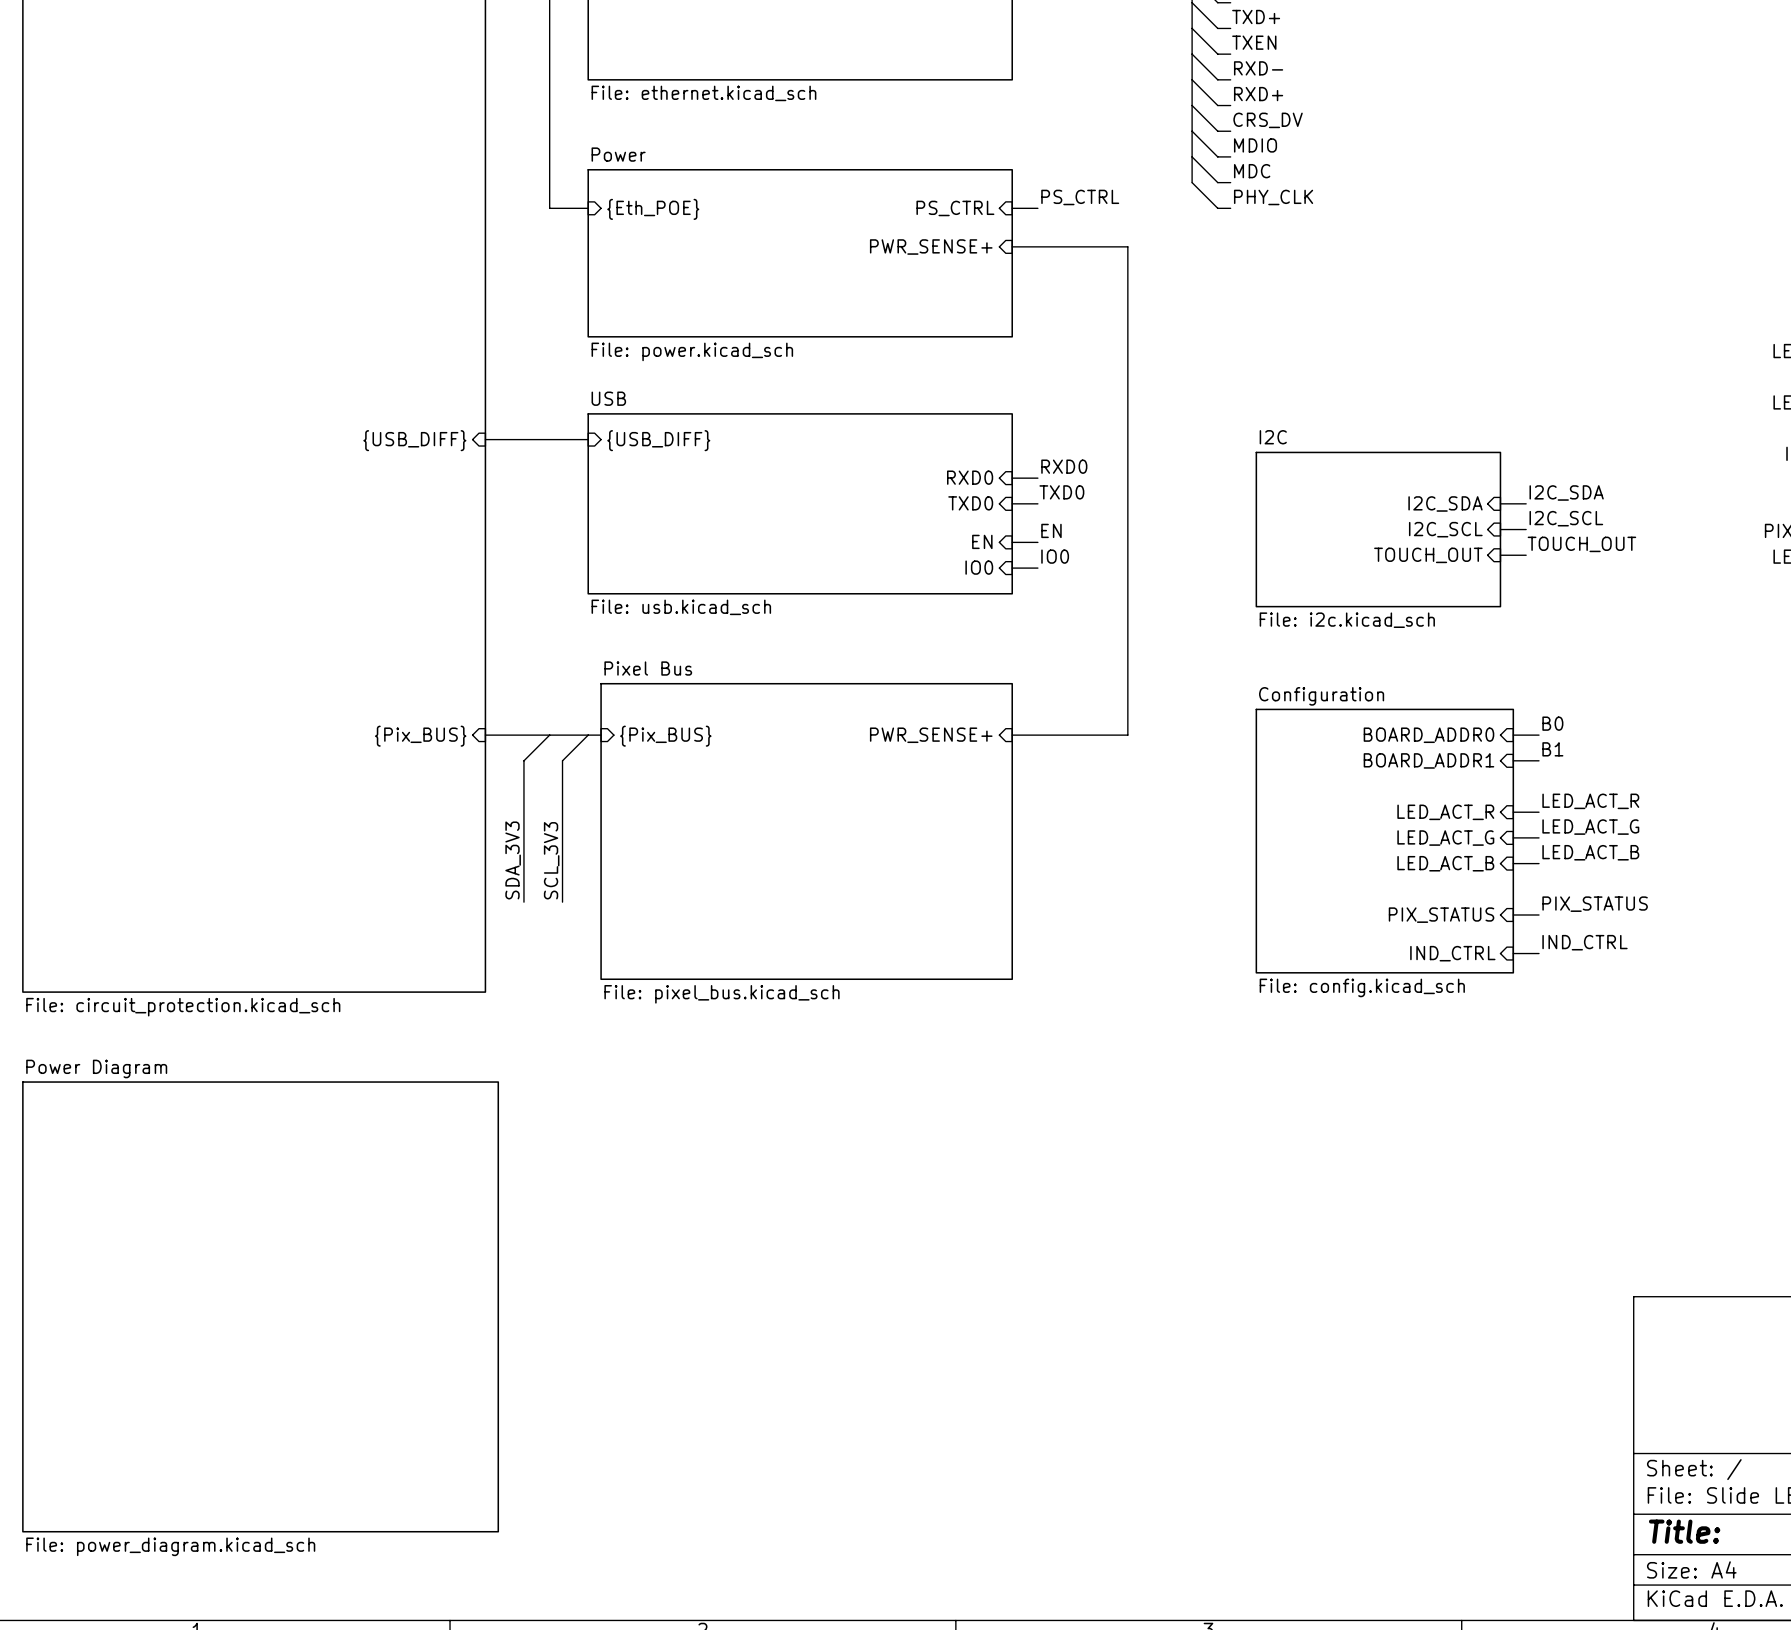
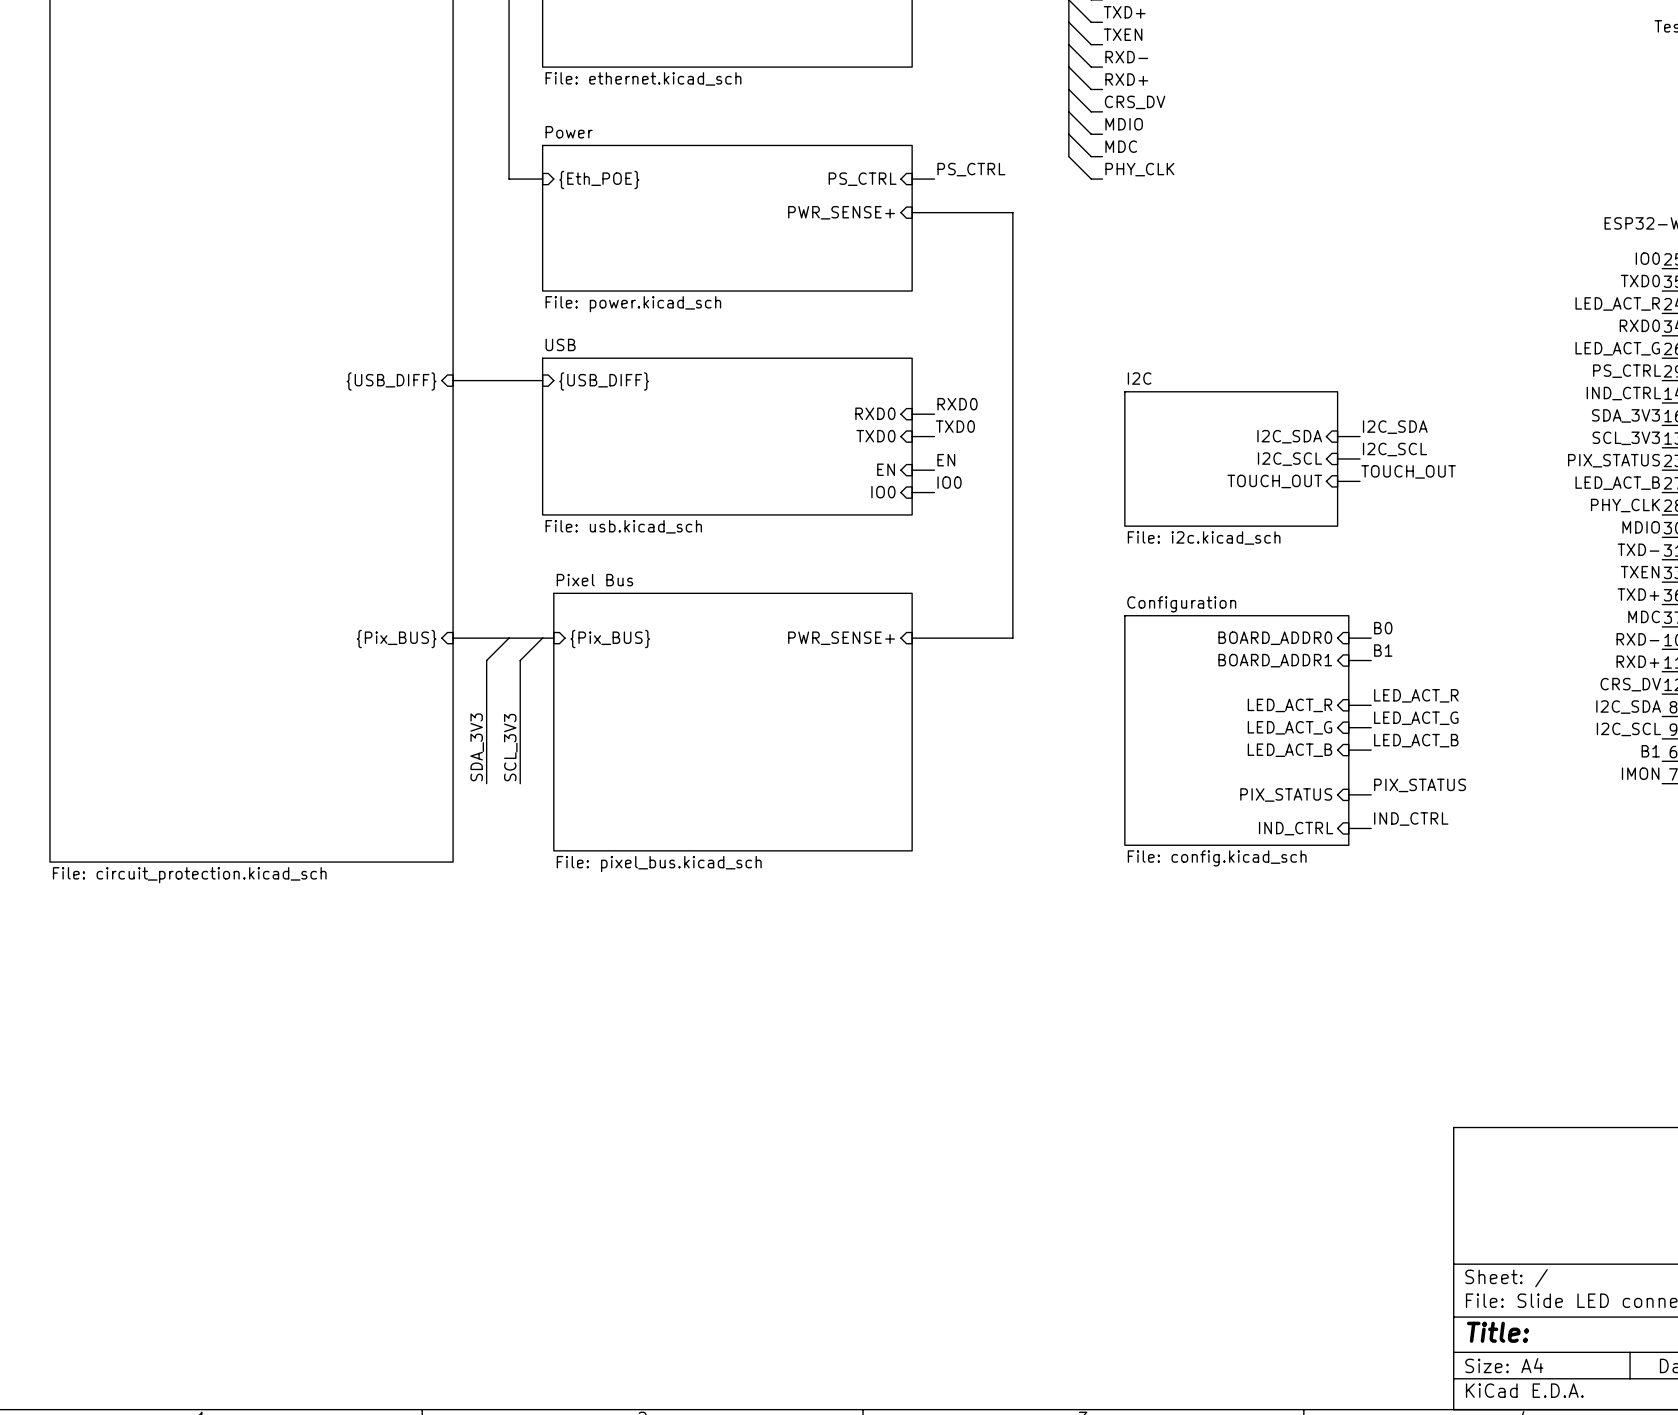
sheet Power Diagram: File: power_diagram.kicad_sch (260, 1306) -> none

